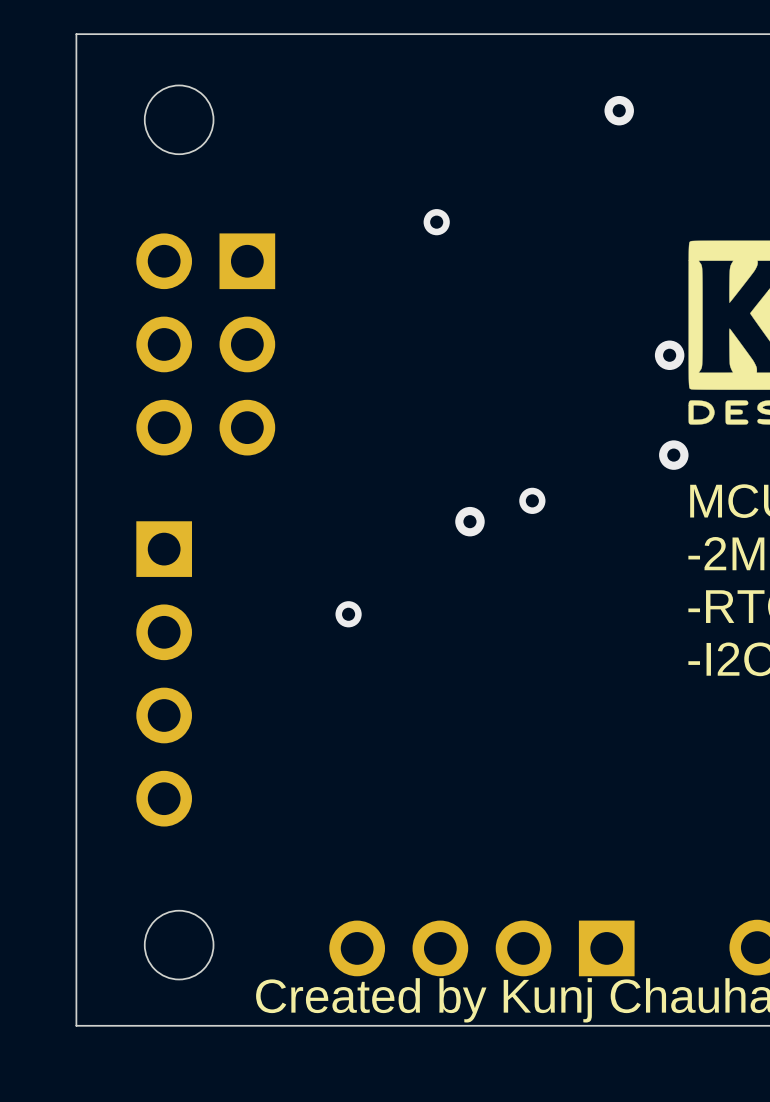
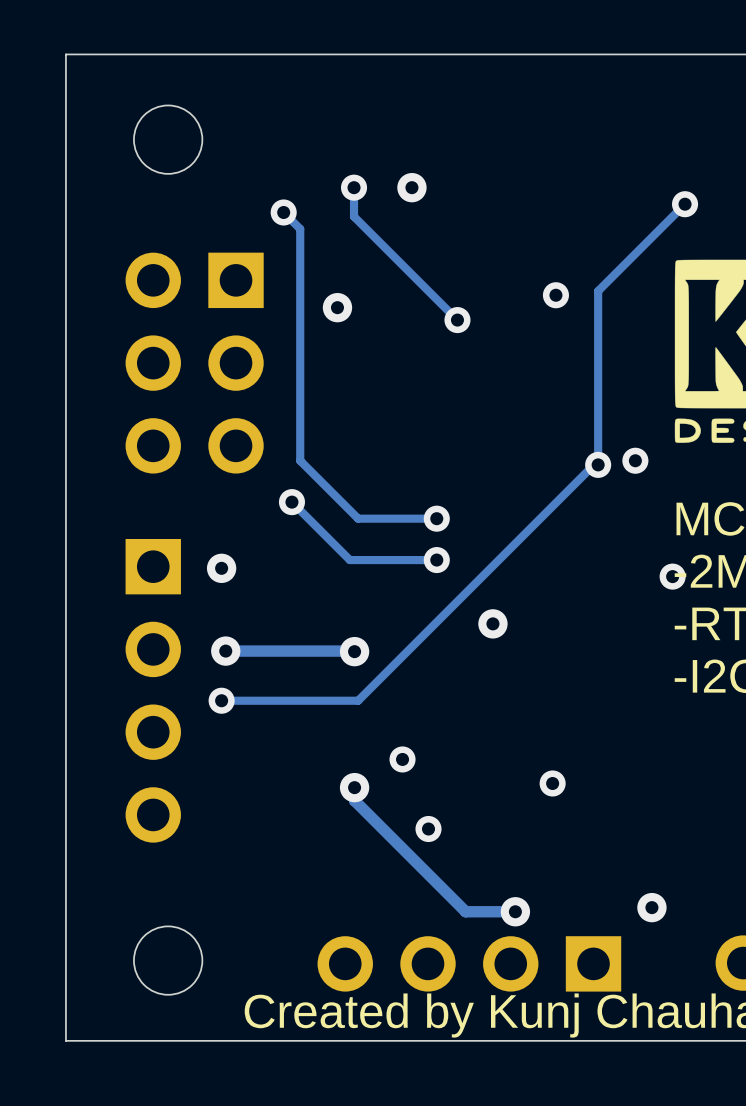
via: (619, 110) -> none
track: none -> (354, 187) (354, 216) (457, 320)
via: none -> (354, 187)
via: none -> (411, 187)
track: none -> (685, 204) (598, 291) (598, 464) (594, 464) (358, 700) (221, 700)
via: none -> (685, 204)
track: none -> (283, 212) (300, 229) (300, 460) (358, 518) (436, 518)
via: none -> (283, 212)
via: (436, 222) -> none
via: none -> (555, 295)
via: none -> (337, 307)
via: none -> (457, 320)
via: (669, 355) -> none
via: none -> (598, 464)
via position: (673, 455) -> (635, 460)
track: none -> (291, 502) (349, 560) (436, 560)
via: none -> (291, 502)
via: none -> (436, 518)
via: (532, 500) -> none
via: (469, 521) -> none
via: none -> (436, 560)
via: none -> (221, 568)
via: none -> (672, 576)
via: none -> (492, 623)
via position: (348, 614) -> (354, 651)
track: none -> (225, 651) (354, 651)
via: none -> (225, 651)
via: none -> (221, 700)
via: none -> (402, 759)
via: none -> (552, 783)
track: none -> (354, 787) (354, 800) (465, 911) (515, 911)
via: none -> (354, 787)
via: none -> (428, 829)
via: none -> (651, 907)
via: none -> (515, 911)

